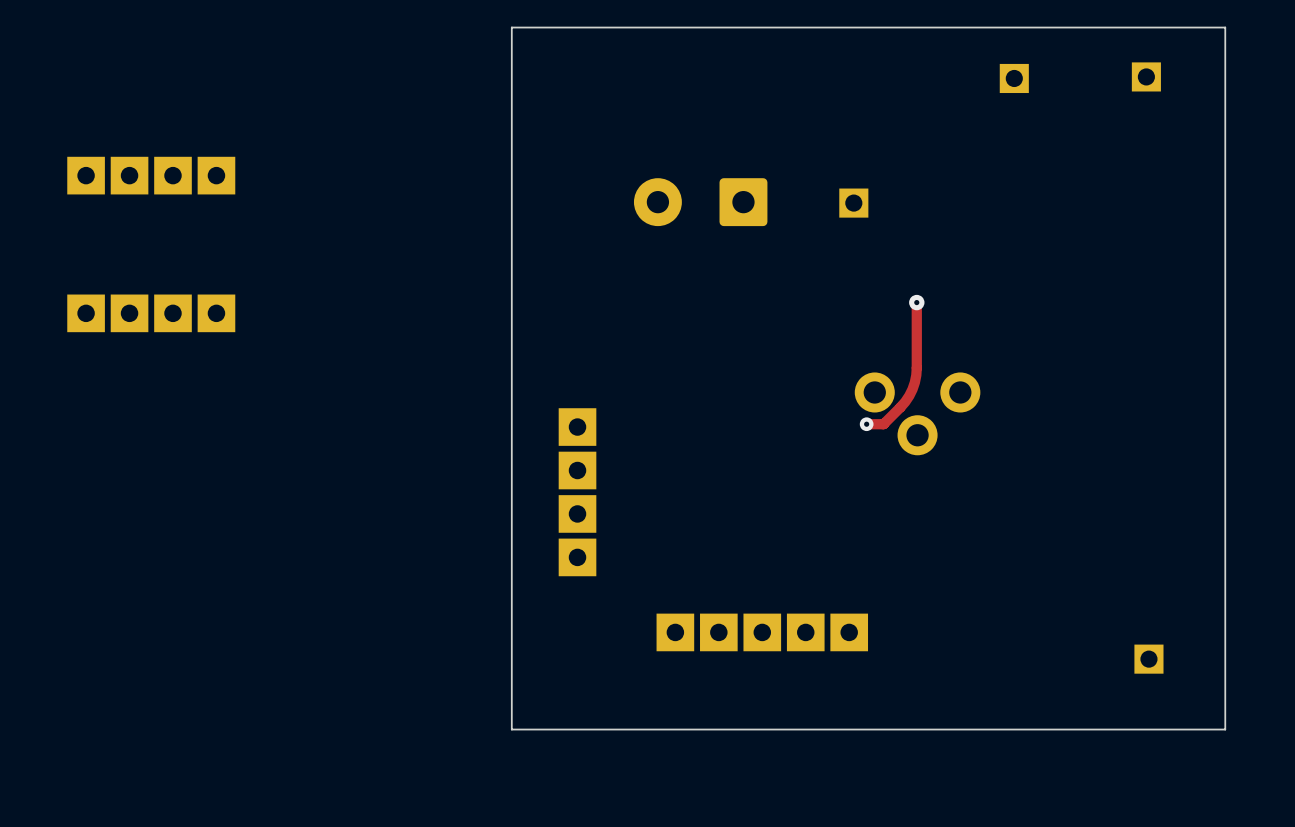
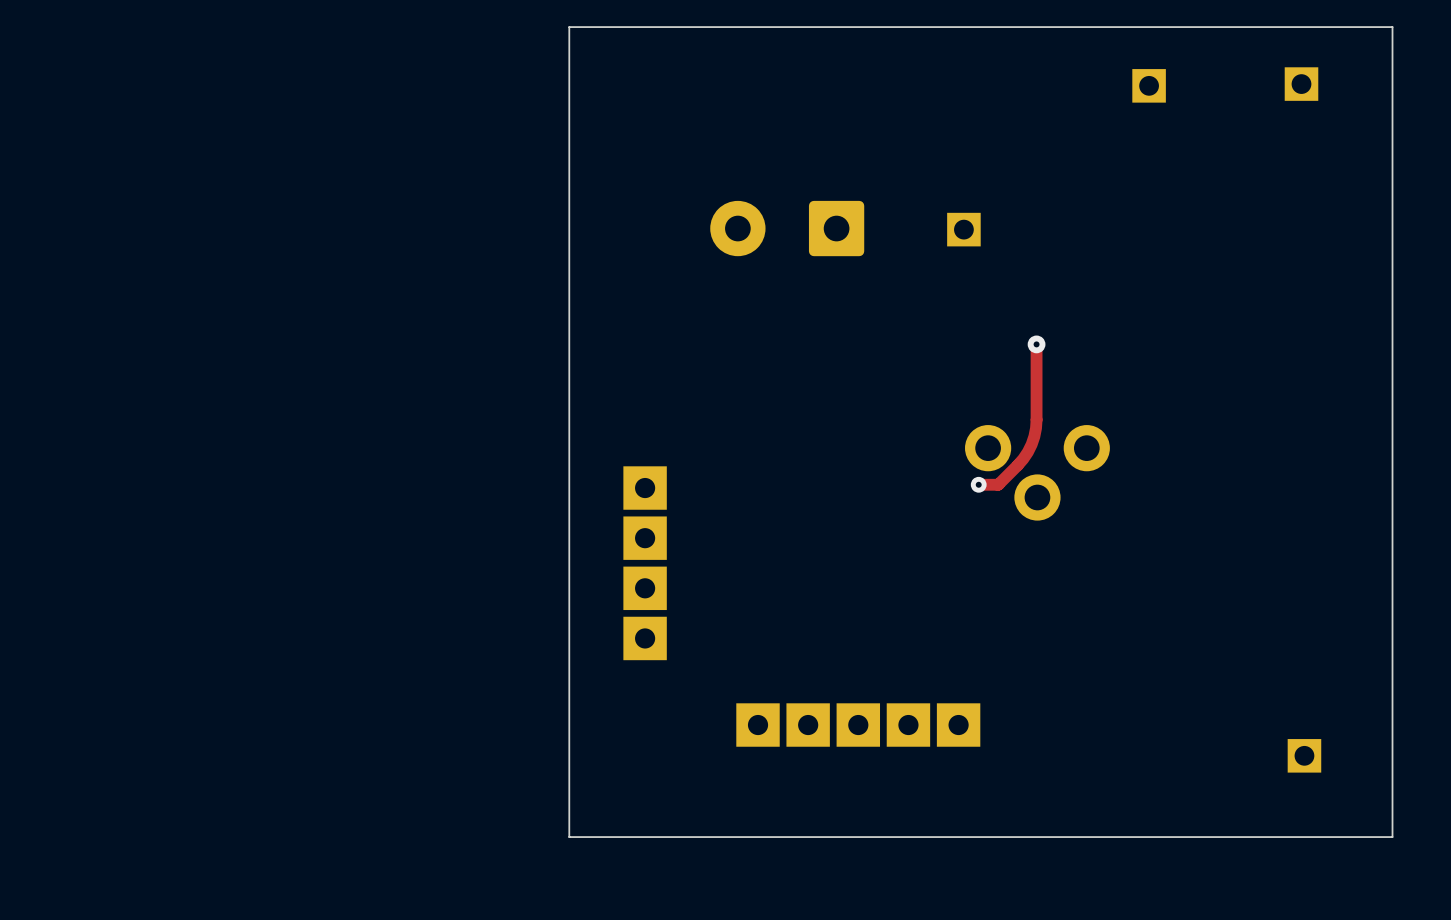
part: (151, 175) -> none
part: (151, 313) -> none

